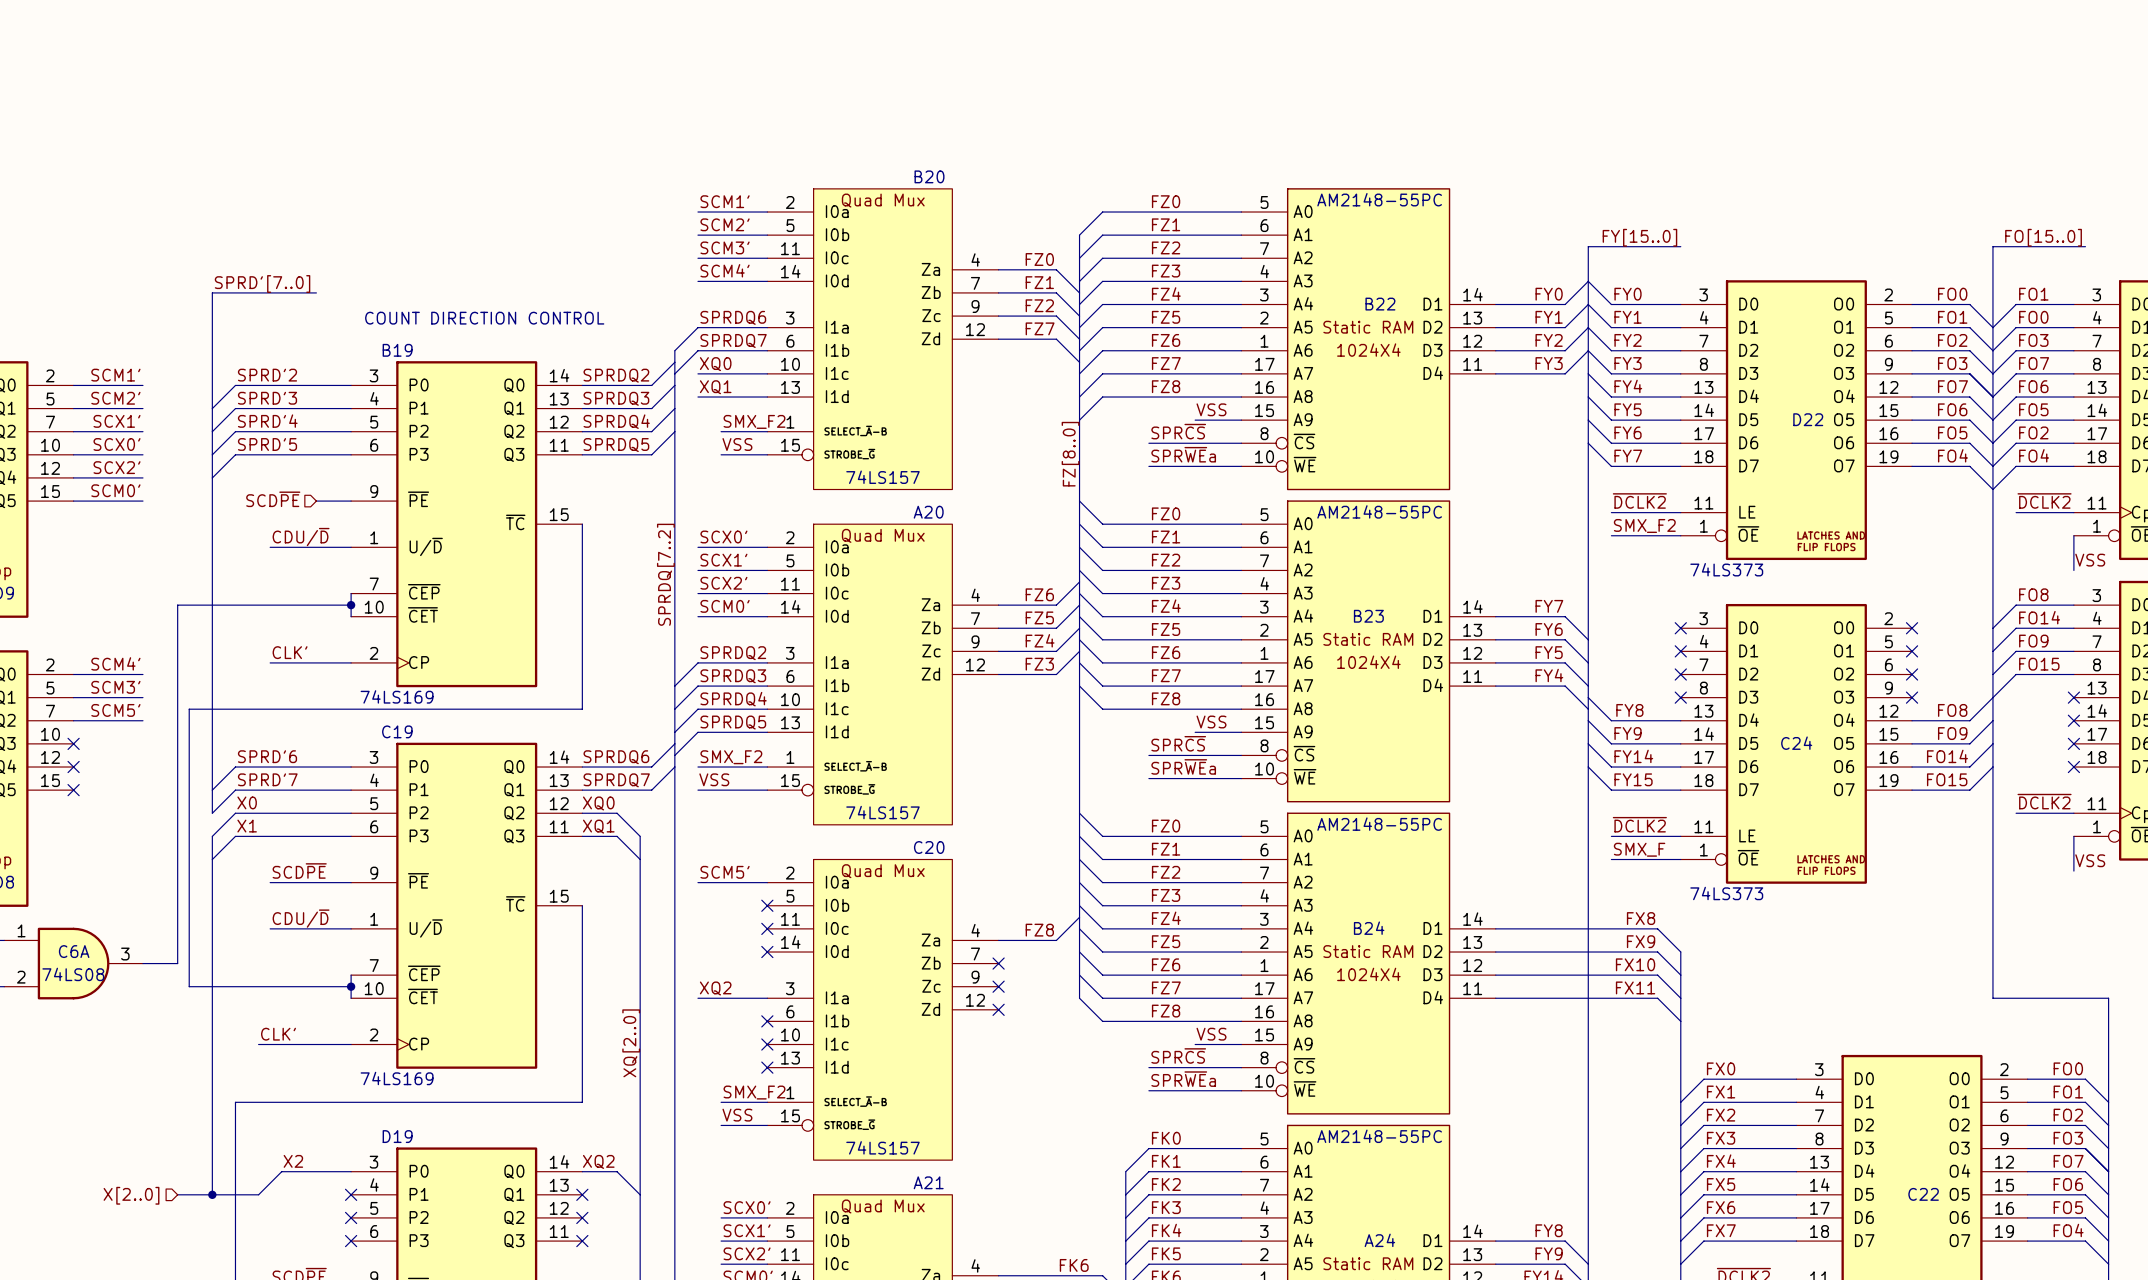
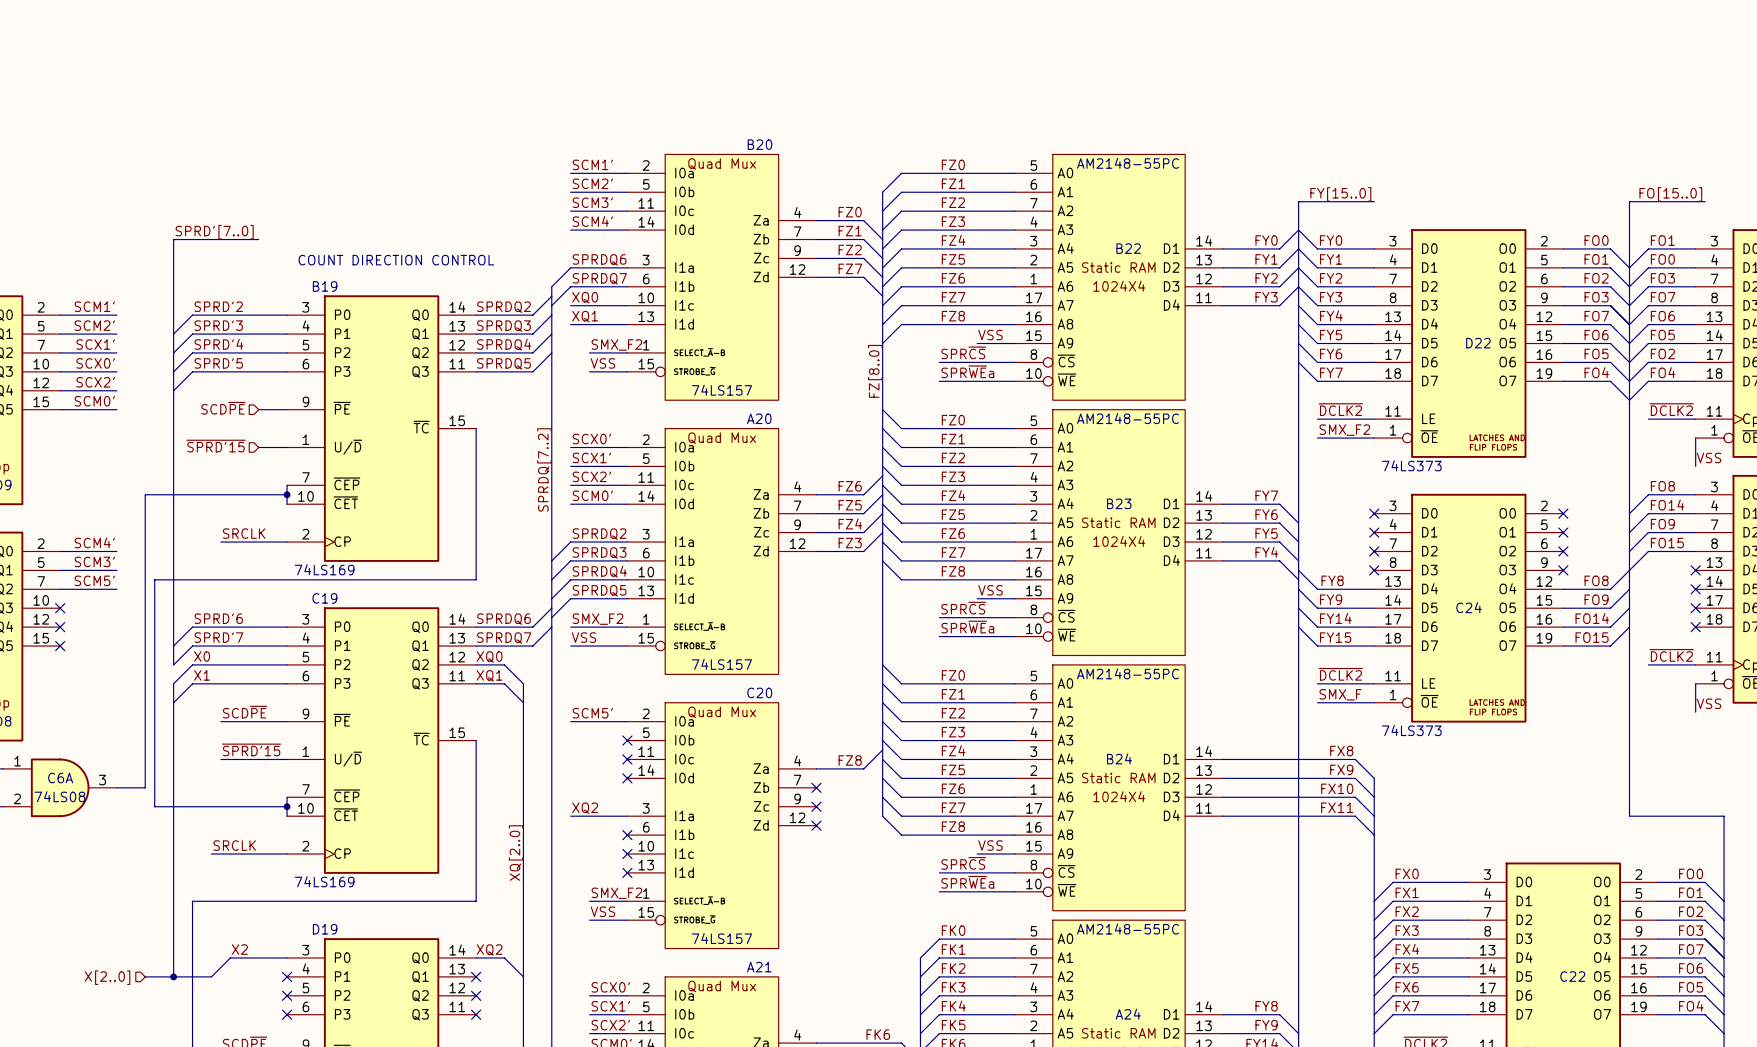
label: CDU/~{D} (301, 537) -> none
hierarchical label: none -> ~{SPRD'15} (216, 446)
wire: (270, 547) (316, 547) -> none
label: CLK' (290, 652) -> SRCLK (244, 533)
label: CDU/~{D} (301, 918) -> ~{SPRD'15} (251, 749)
label: CLK' (278, 1034) -> SRCLK (234, 845)

